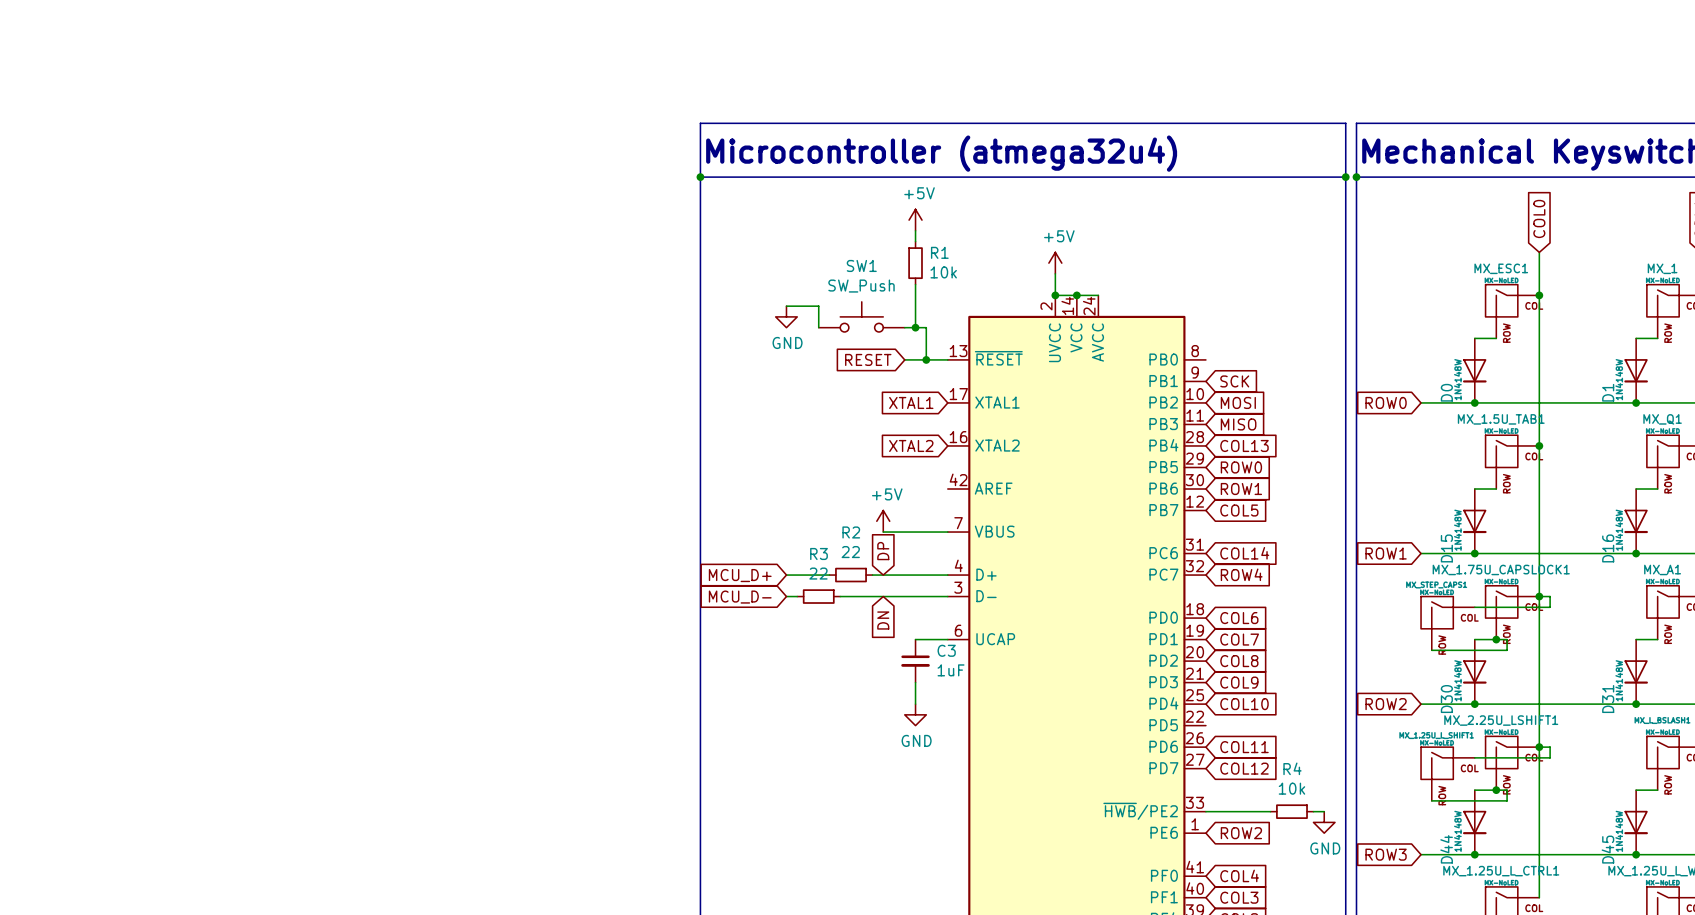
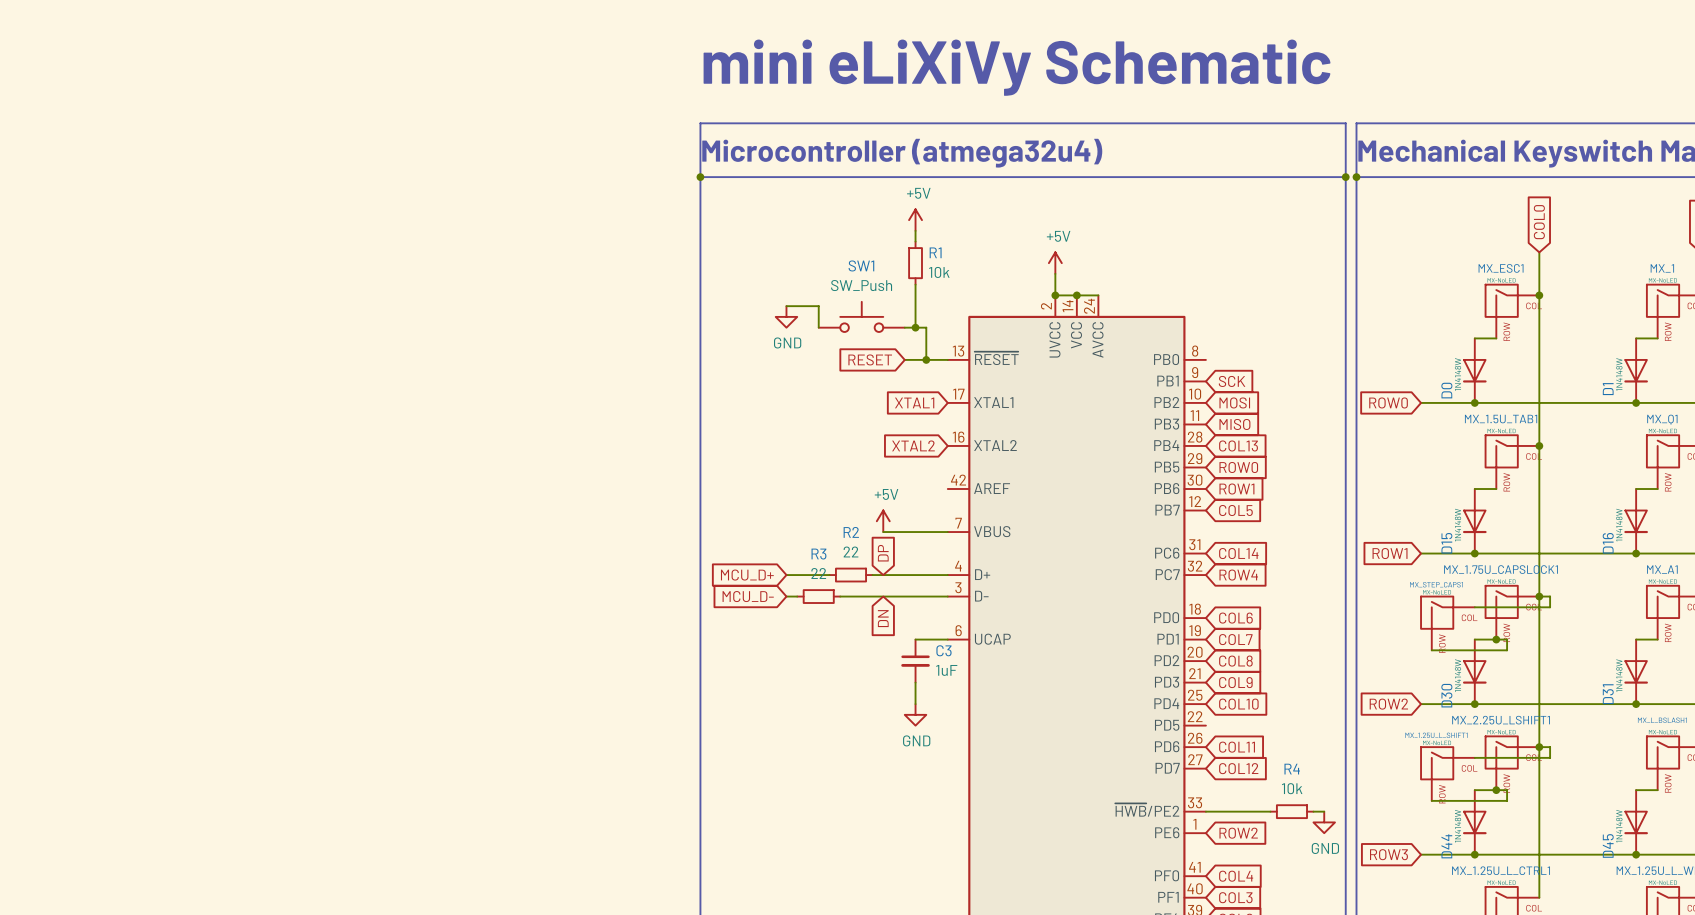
text: none -> mini eLiXiVy Schematic (1017, 67)

